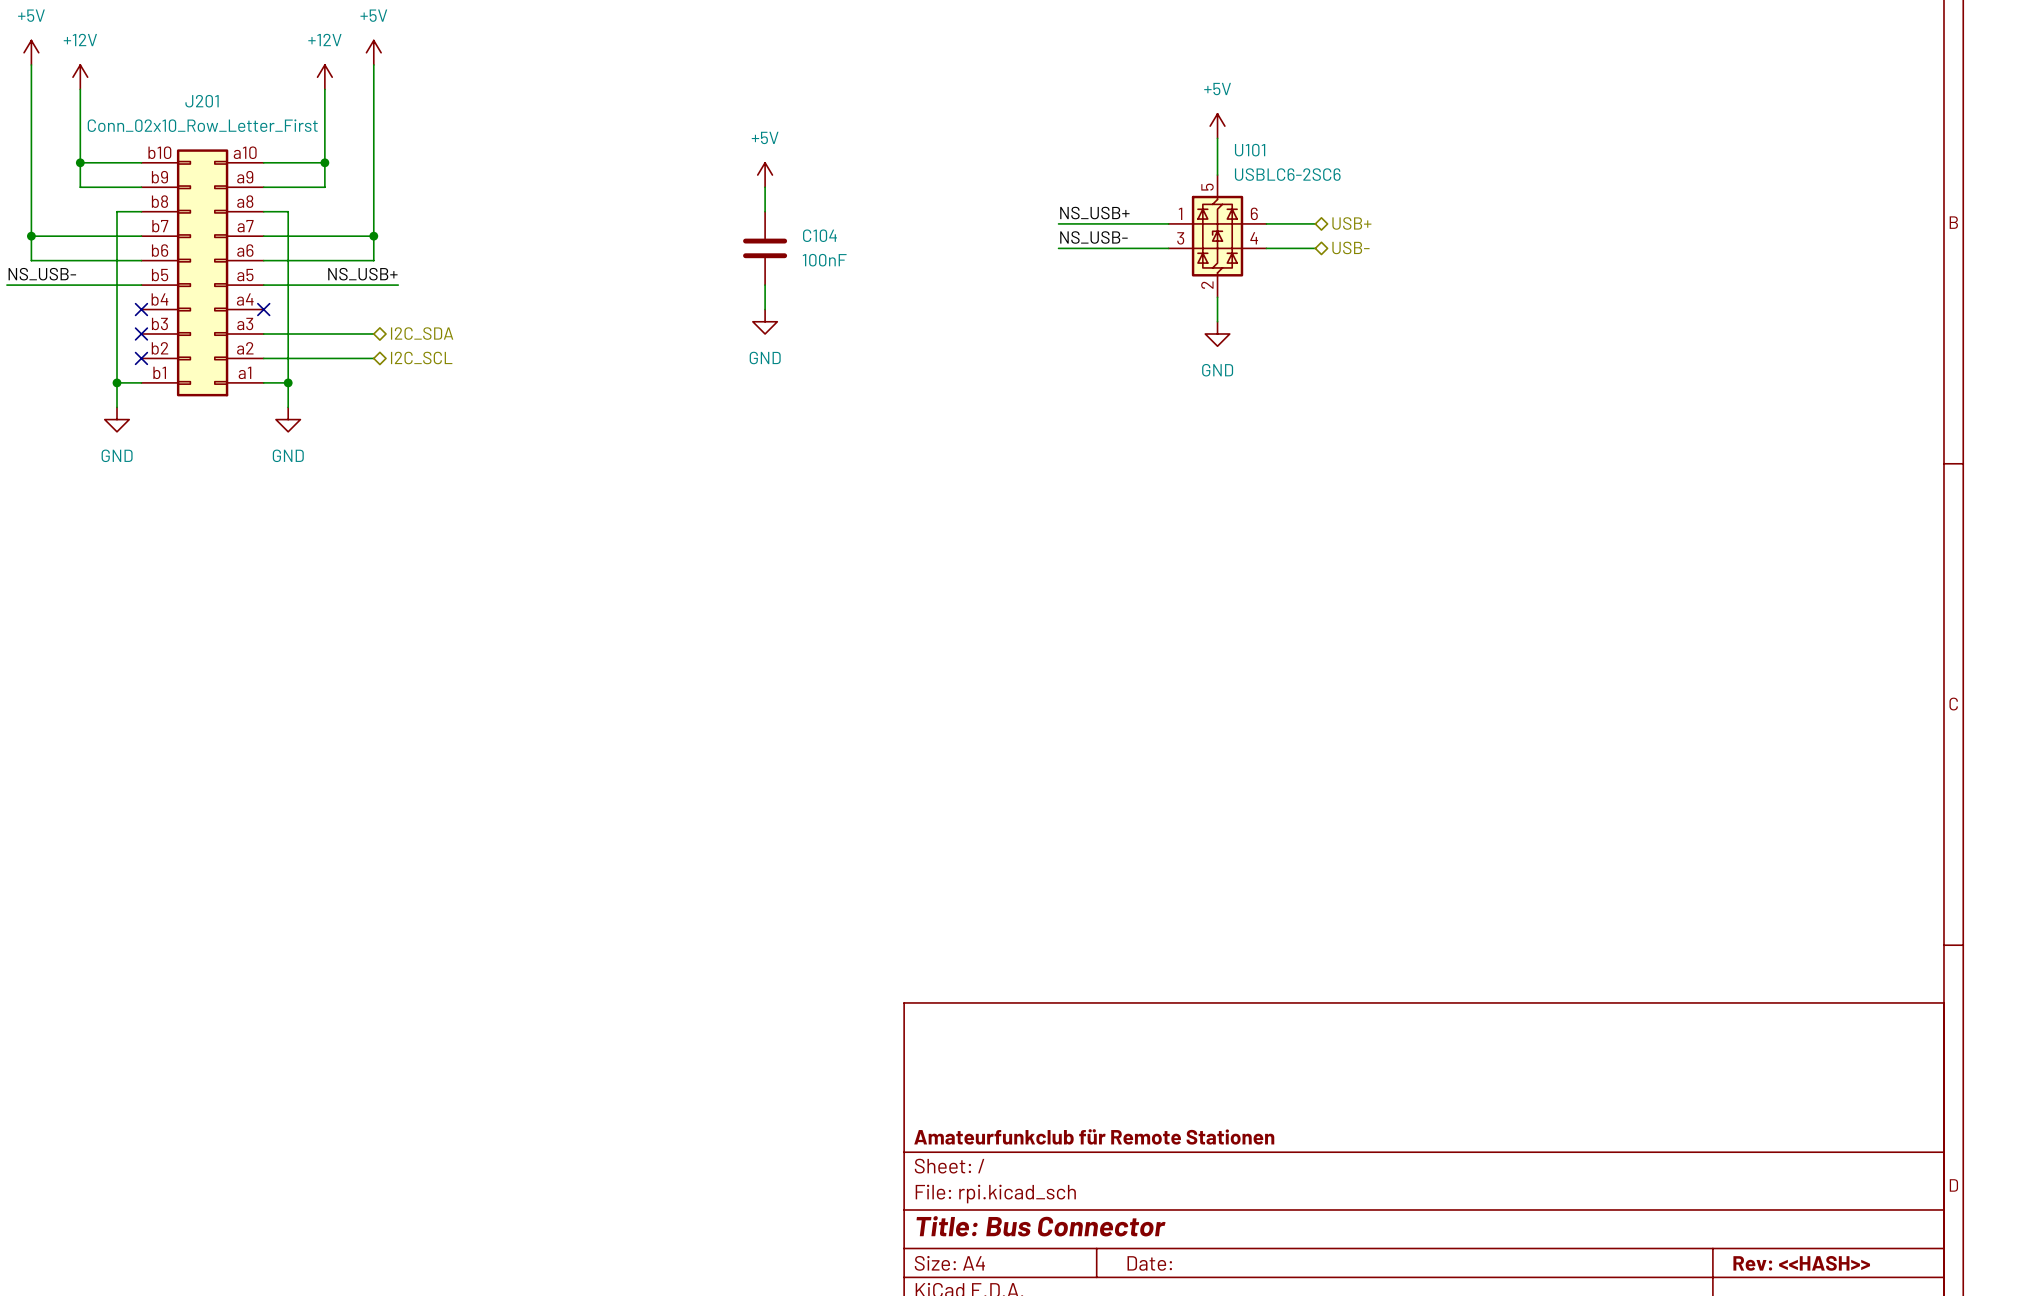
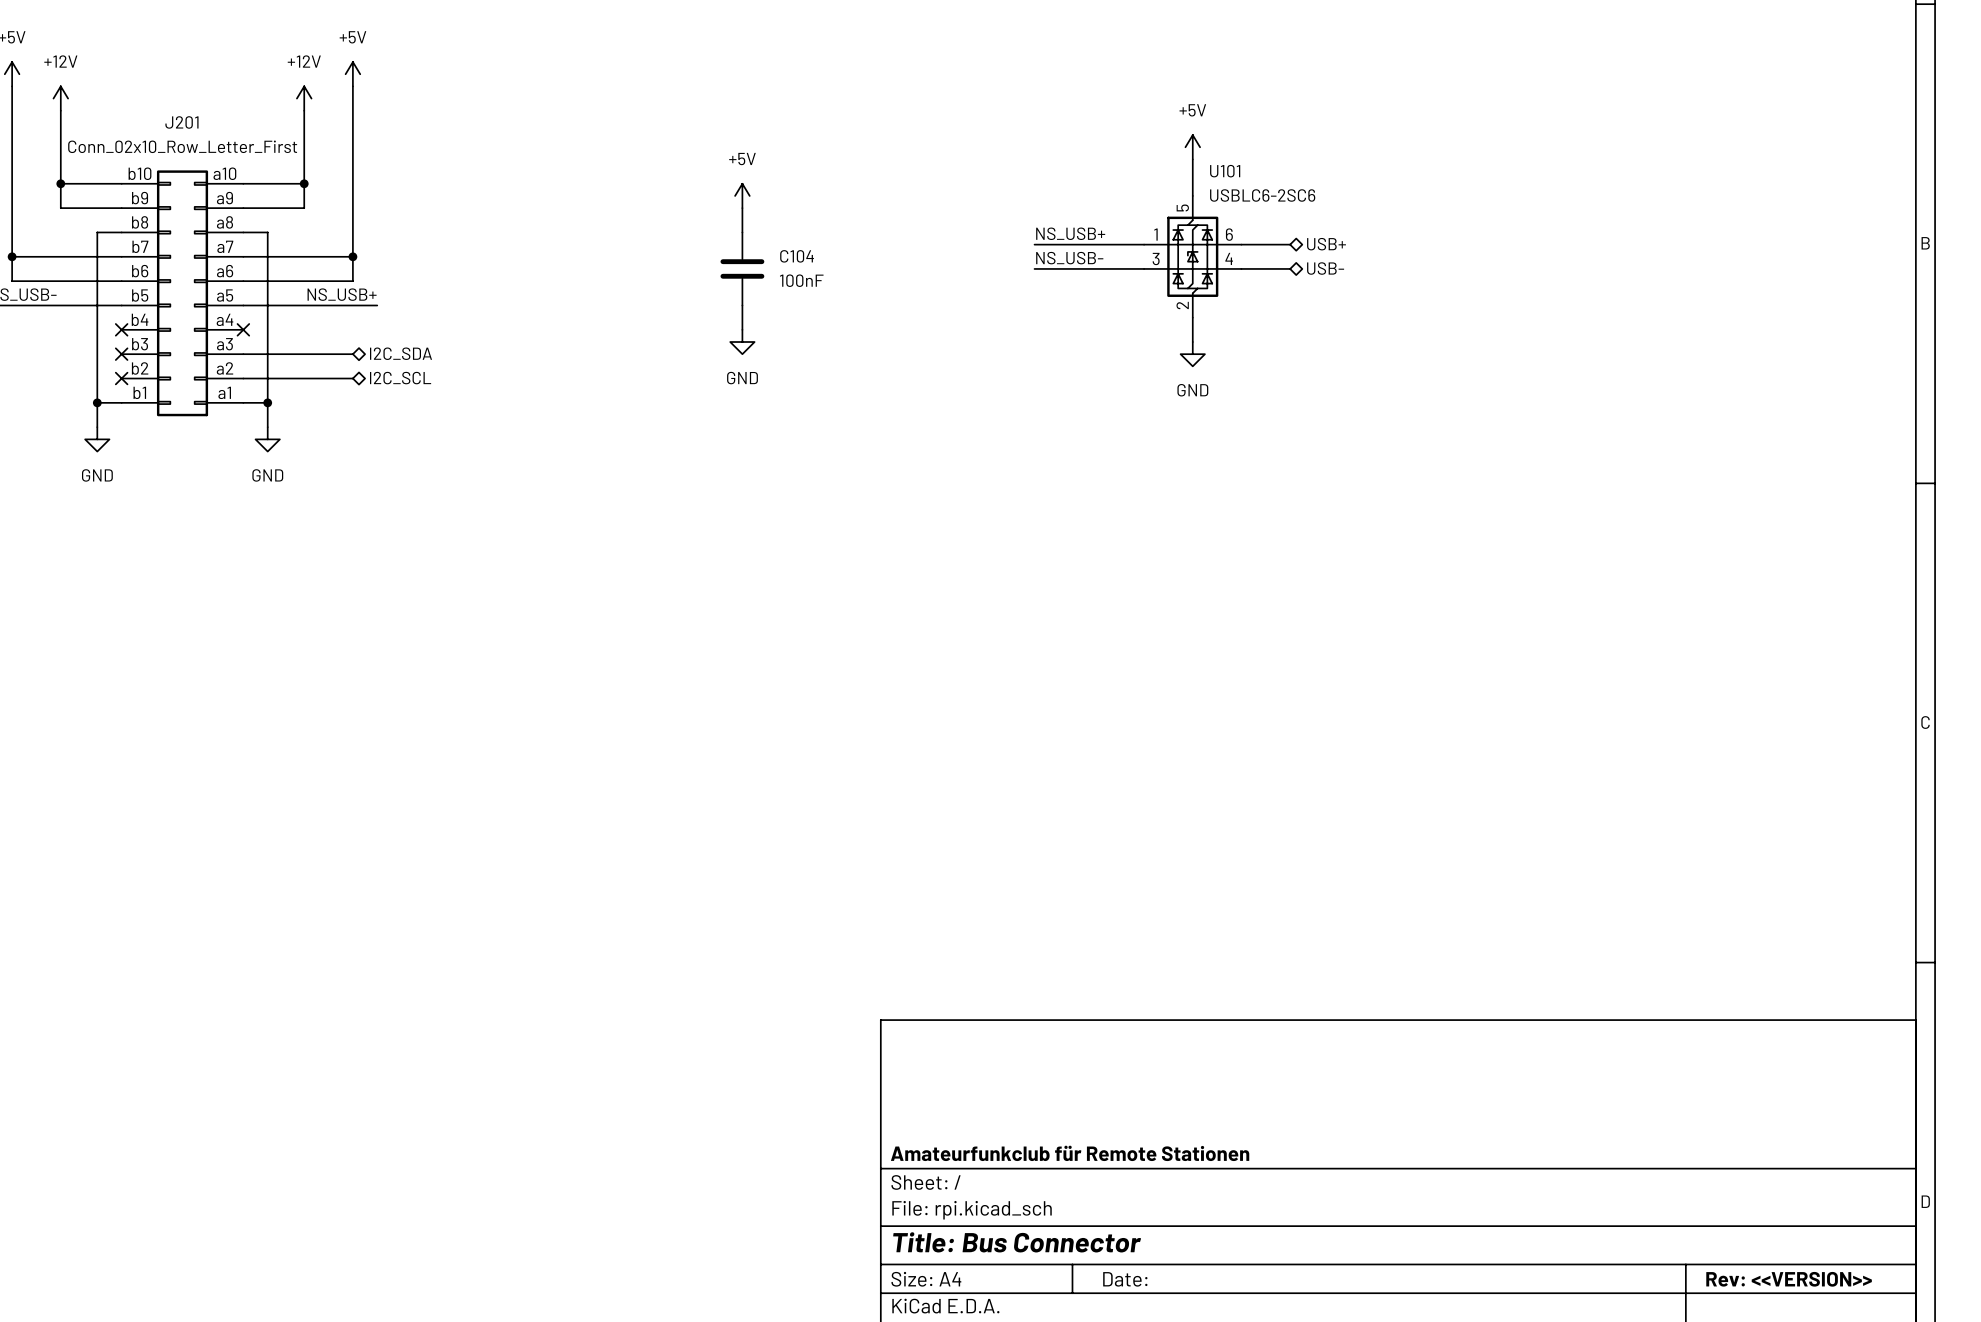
title block: Rev: <<HASH>> (1801, 1263) -> Rev: <<VERSION>> (1789, 1279)

